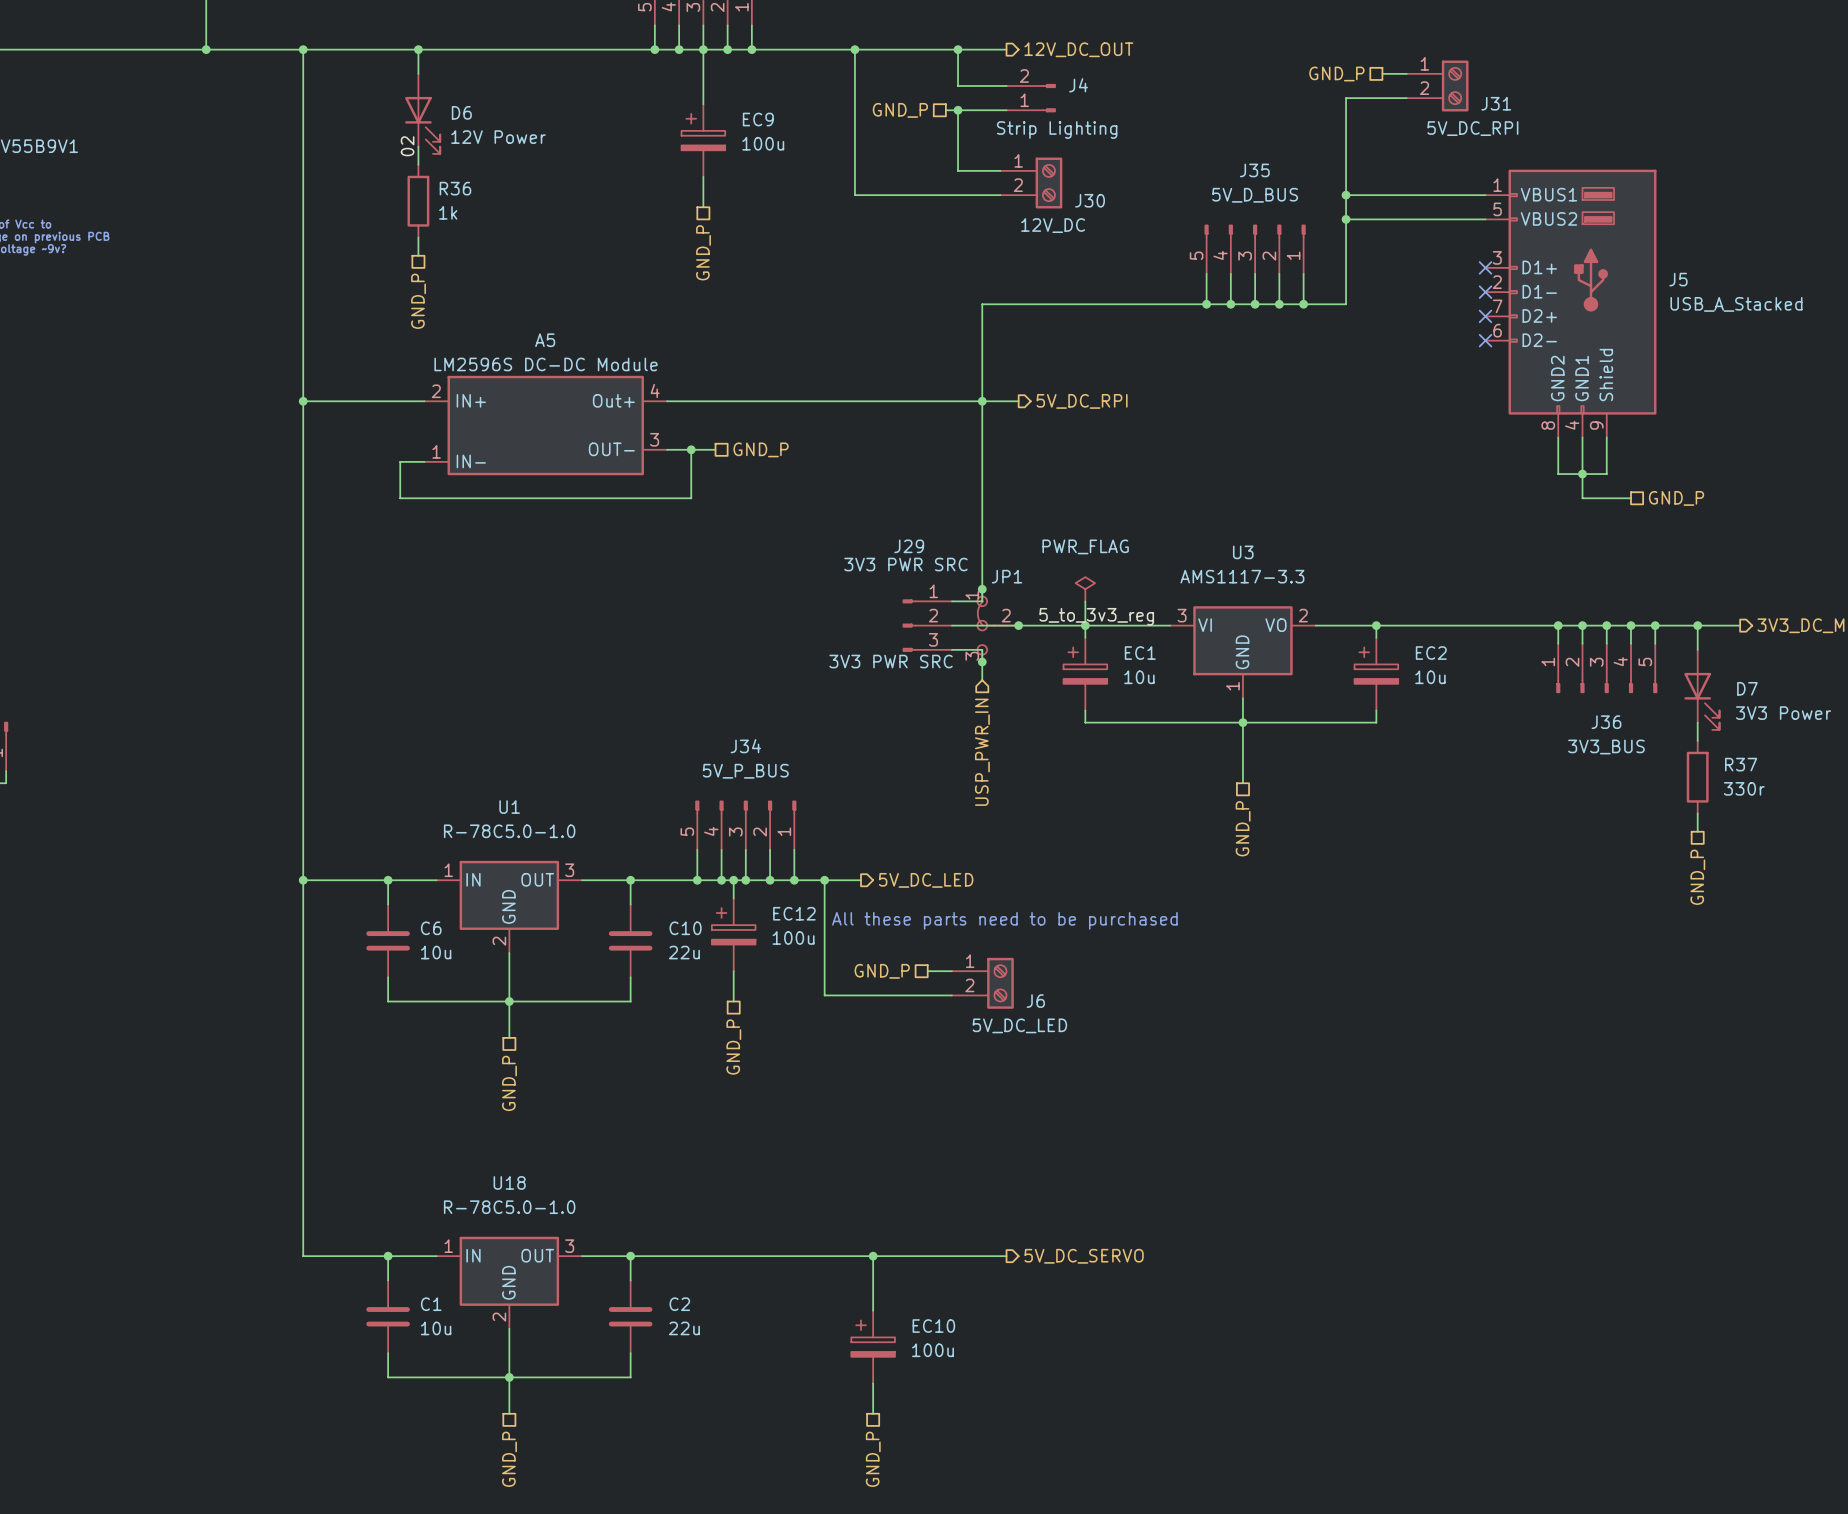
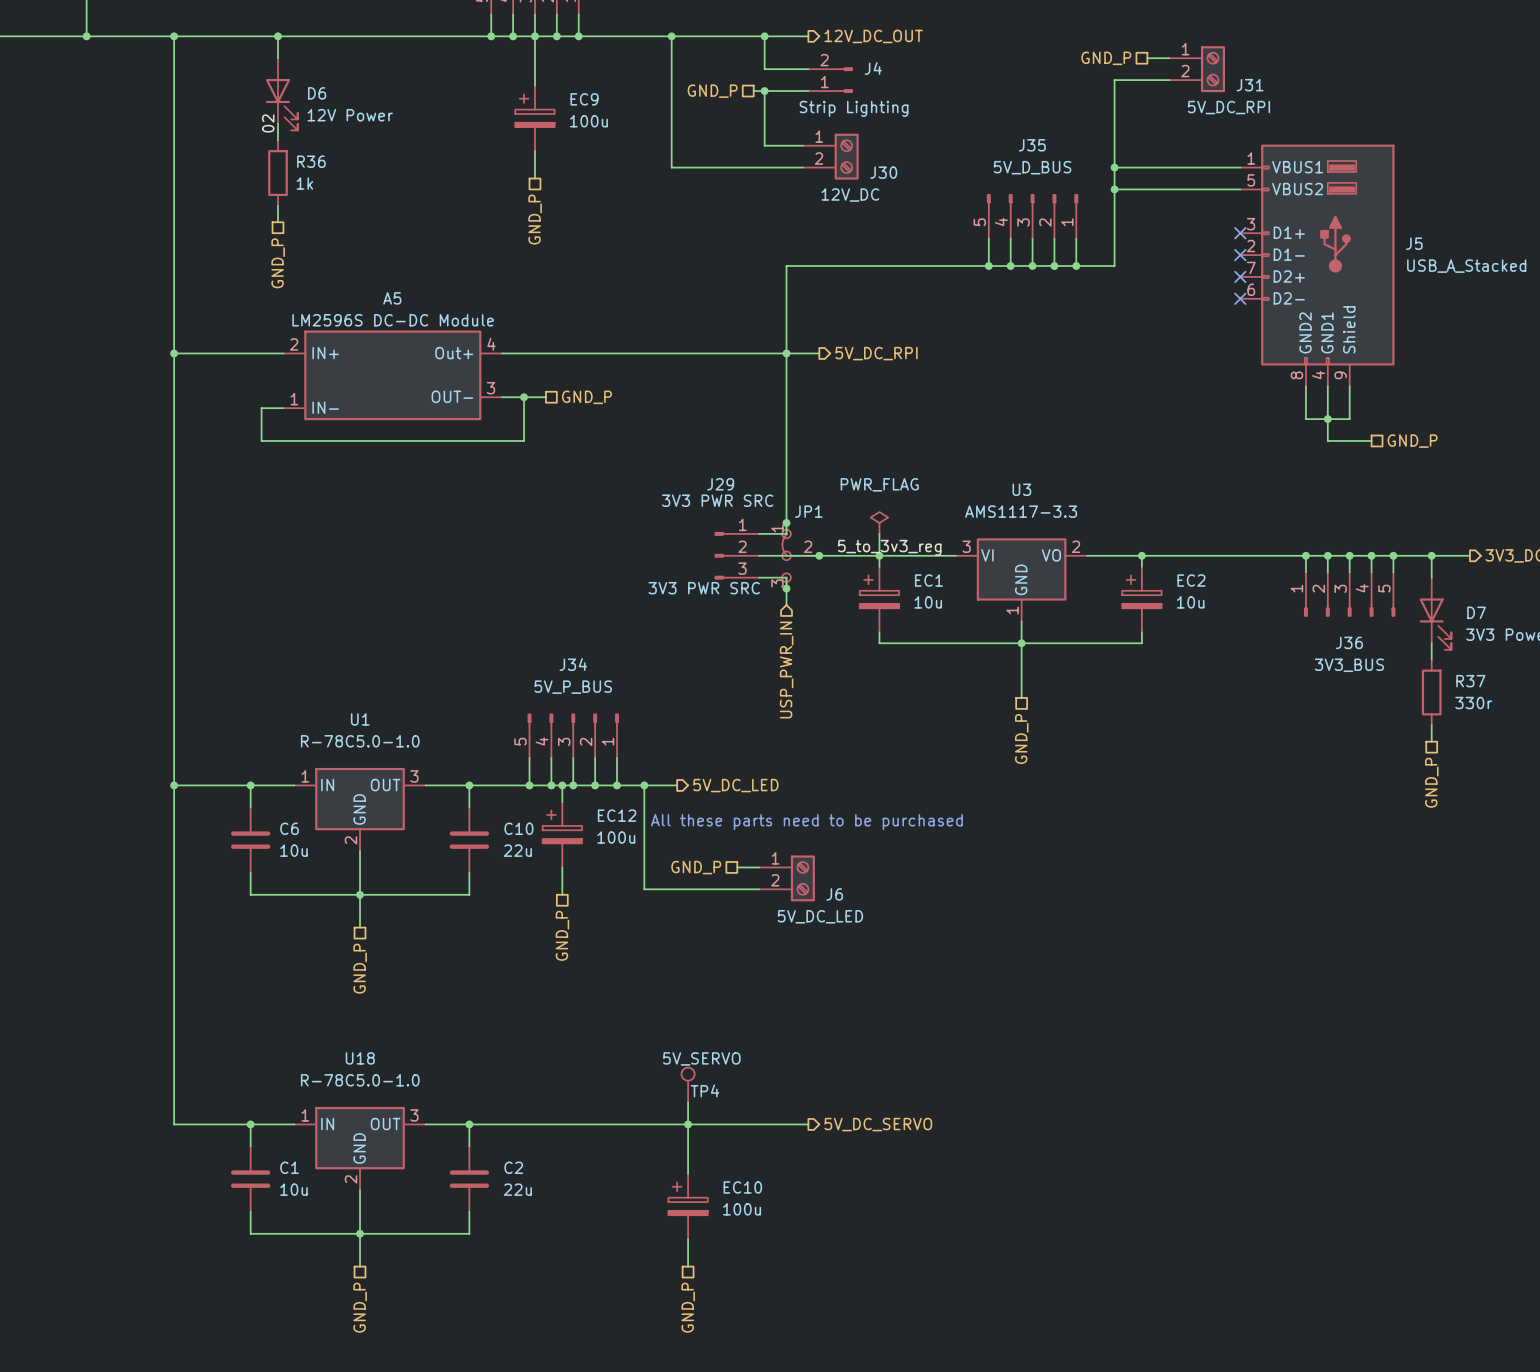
TP4: none -> 5V_SERVO (688, 1085)
wire: none -> (688, 1102) (688, 1124)

